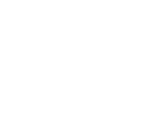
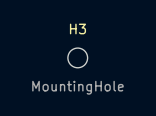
H3: none -> MountingHole (77, 57)

